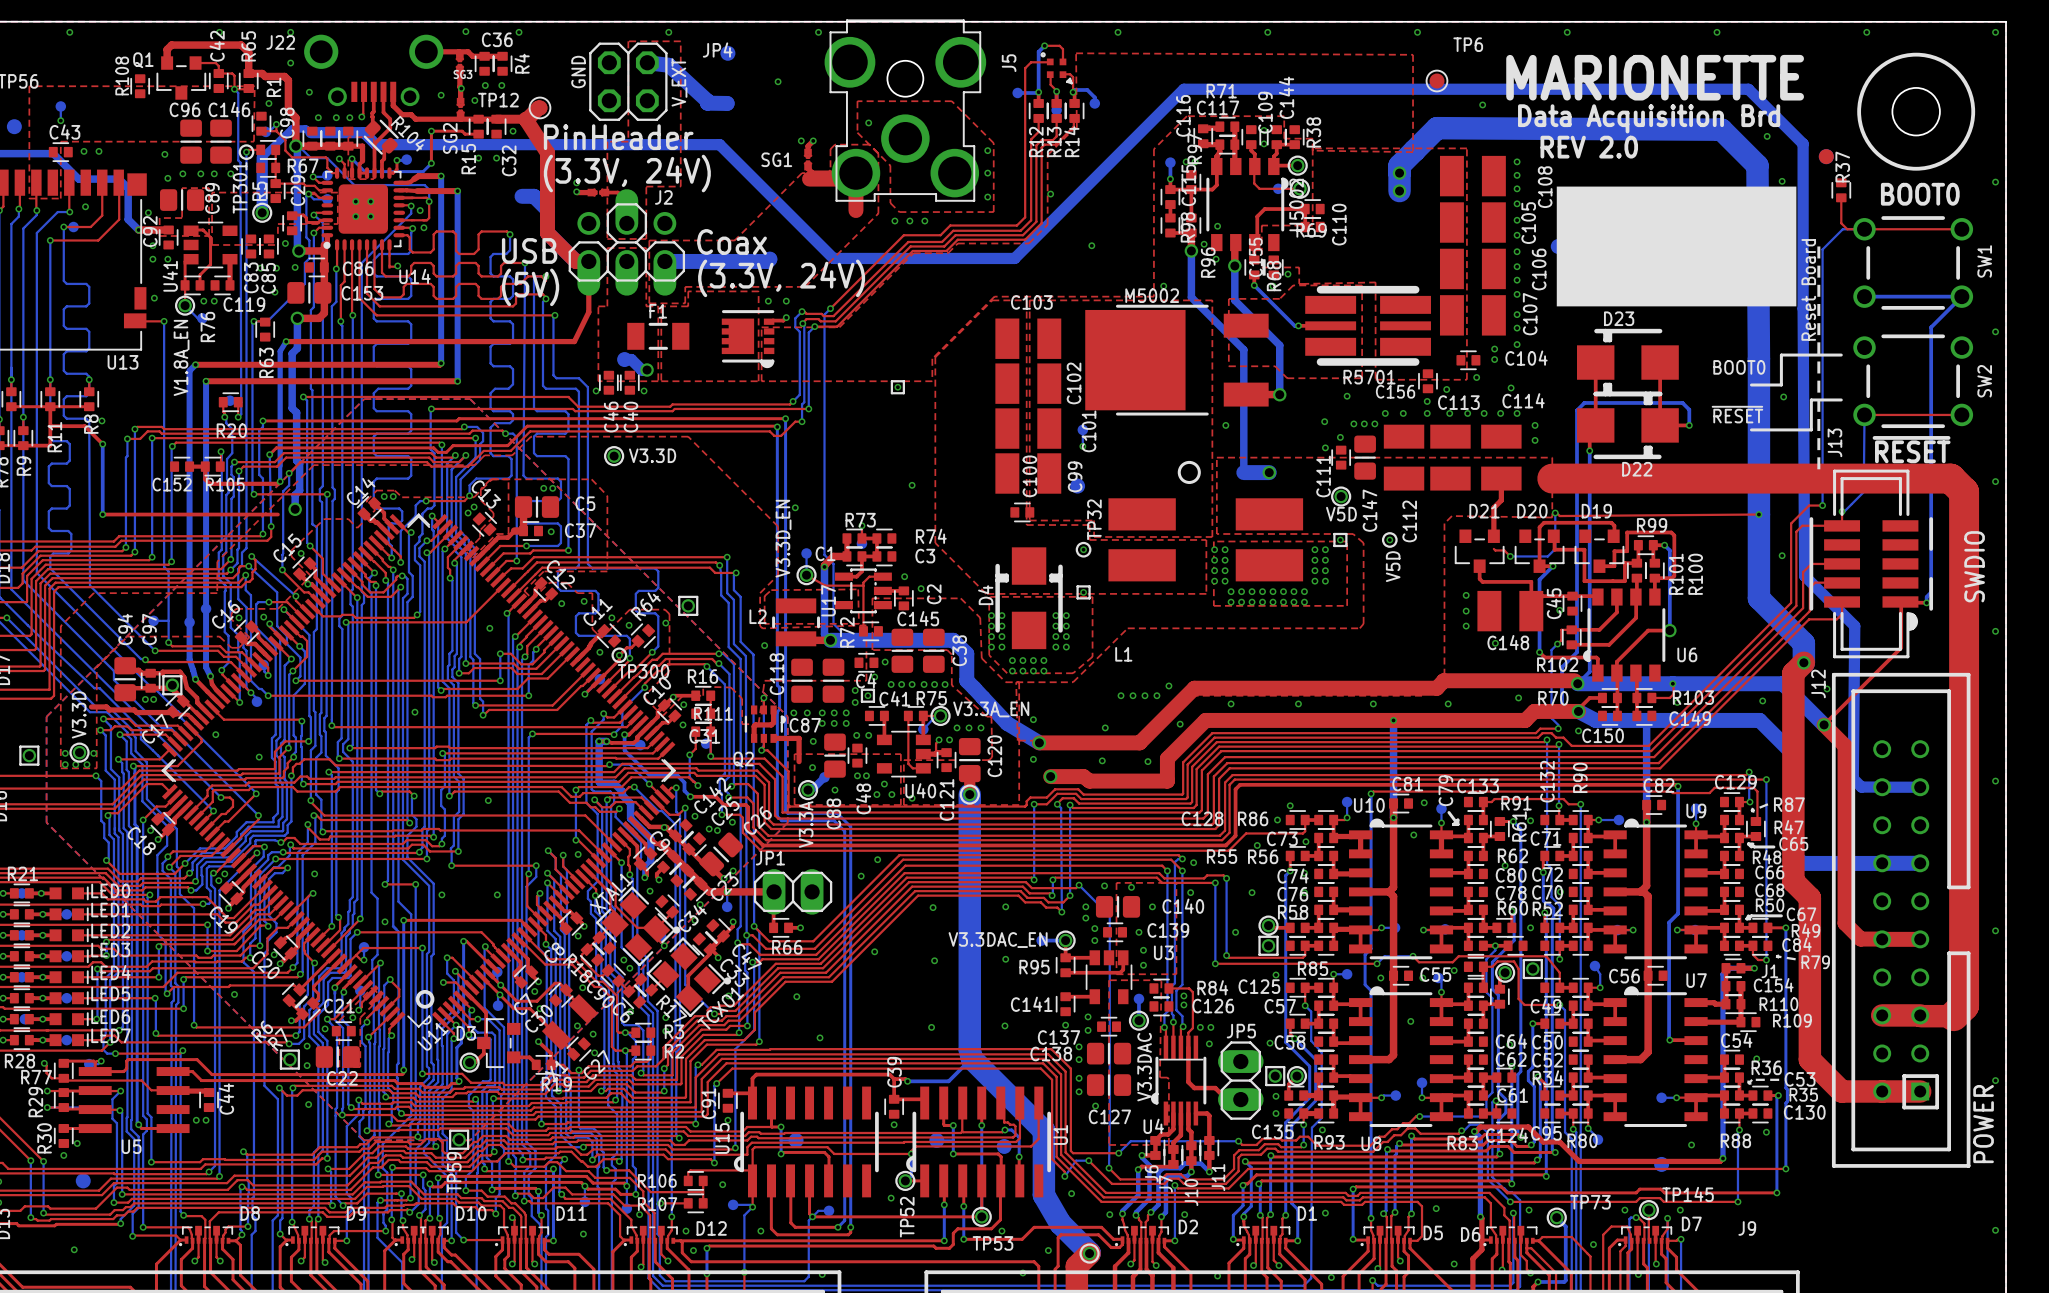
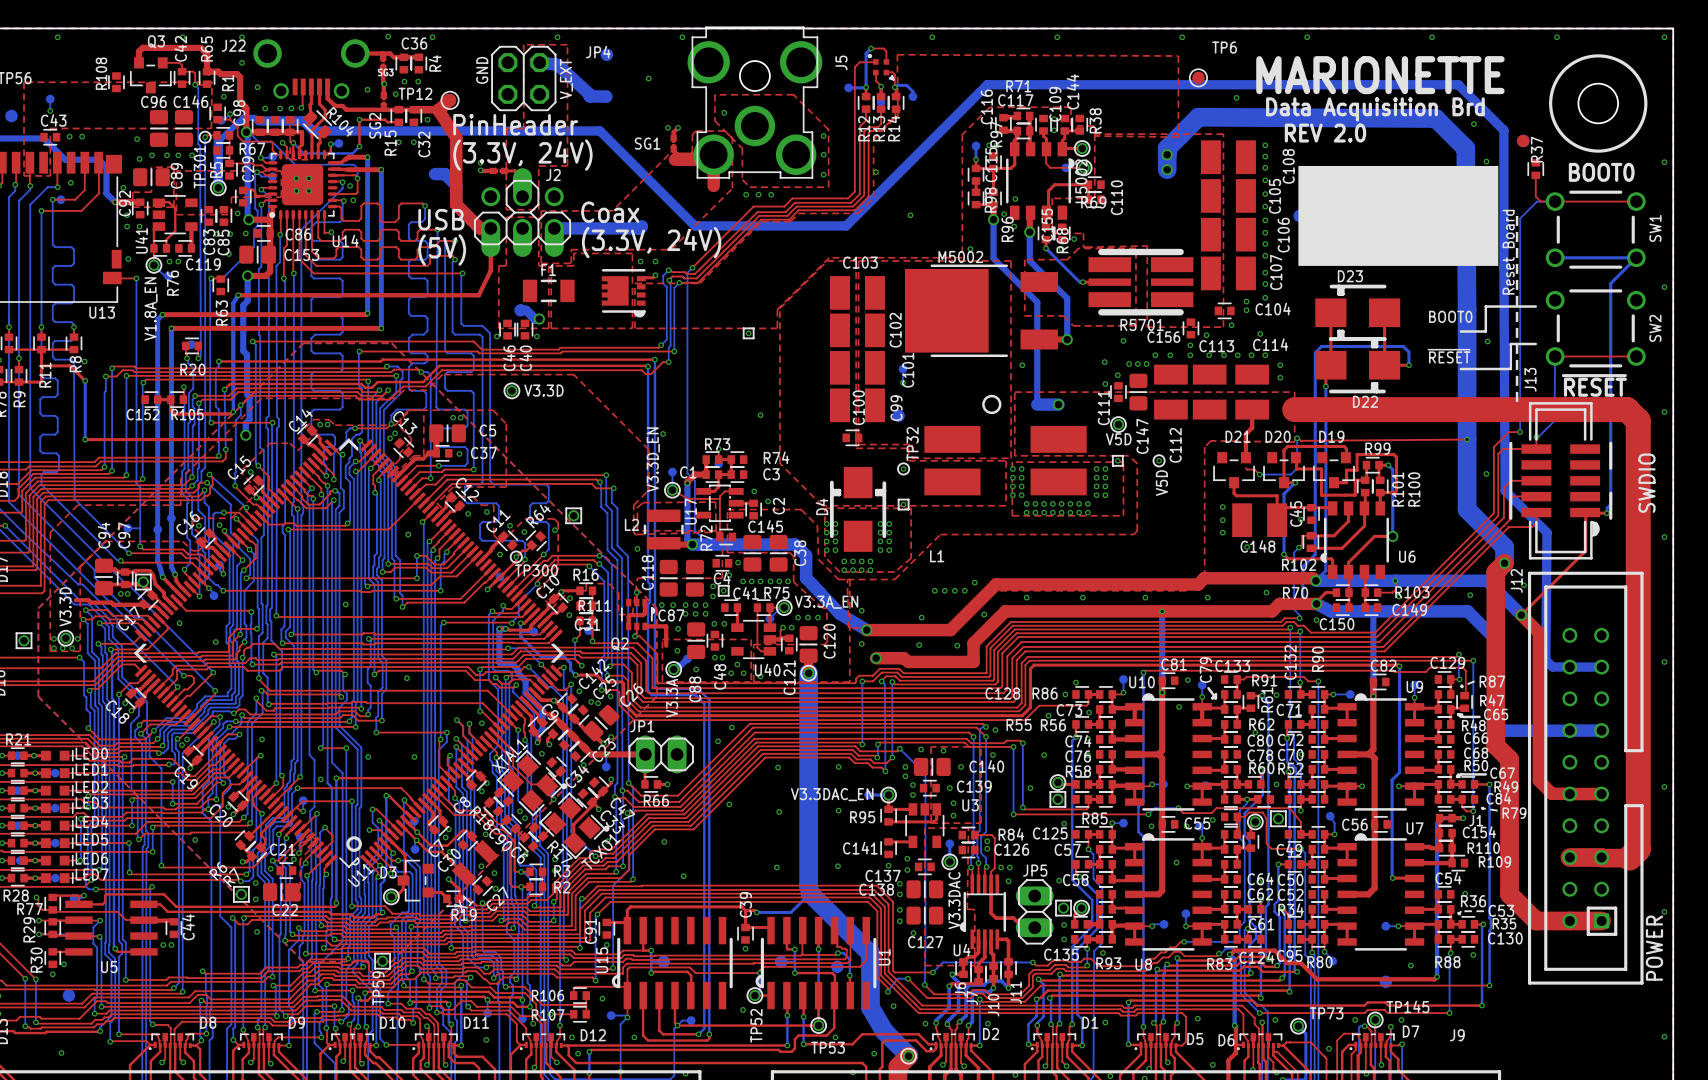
Q1 name: Q1 (143, 60) -> Q3 (156, 41)

